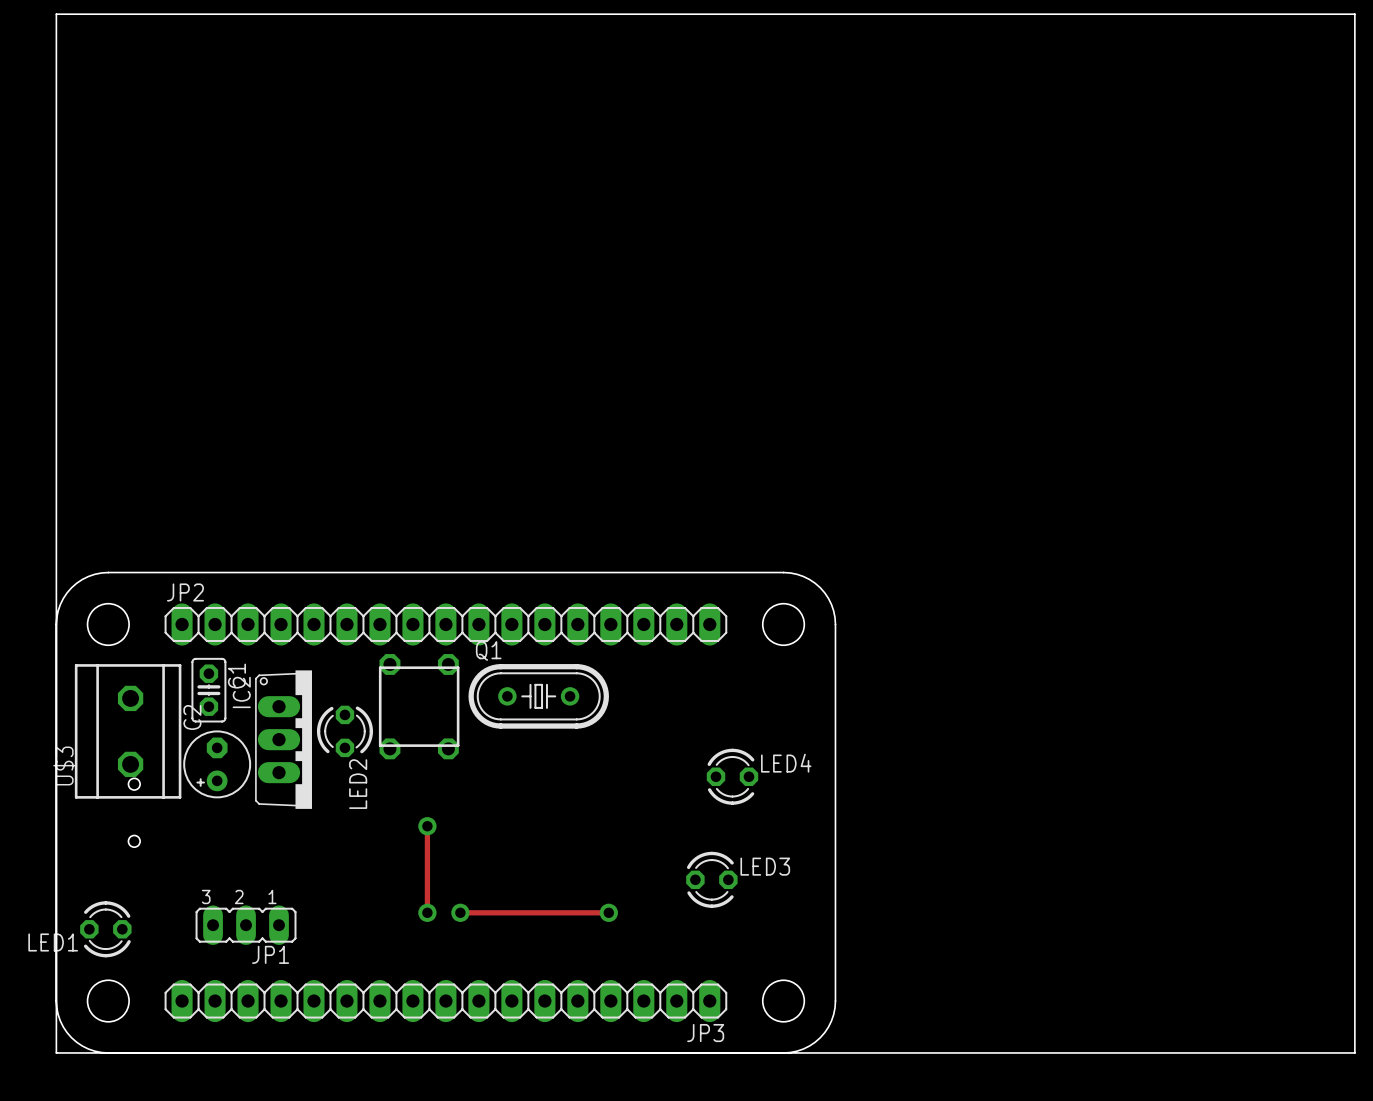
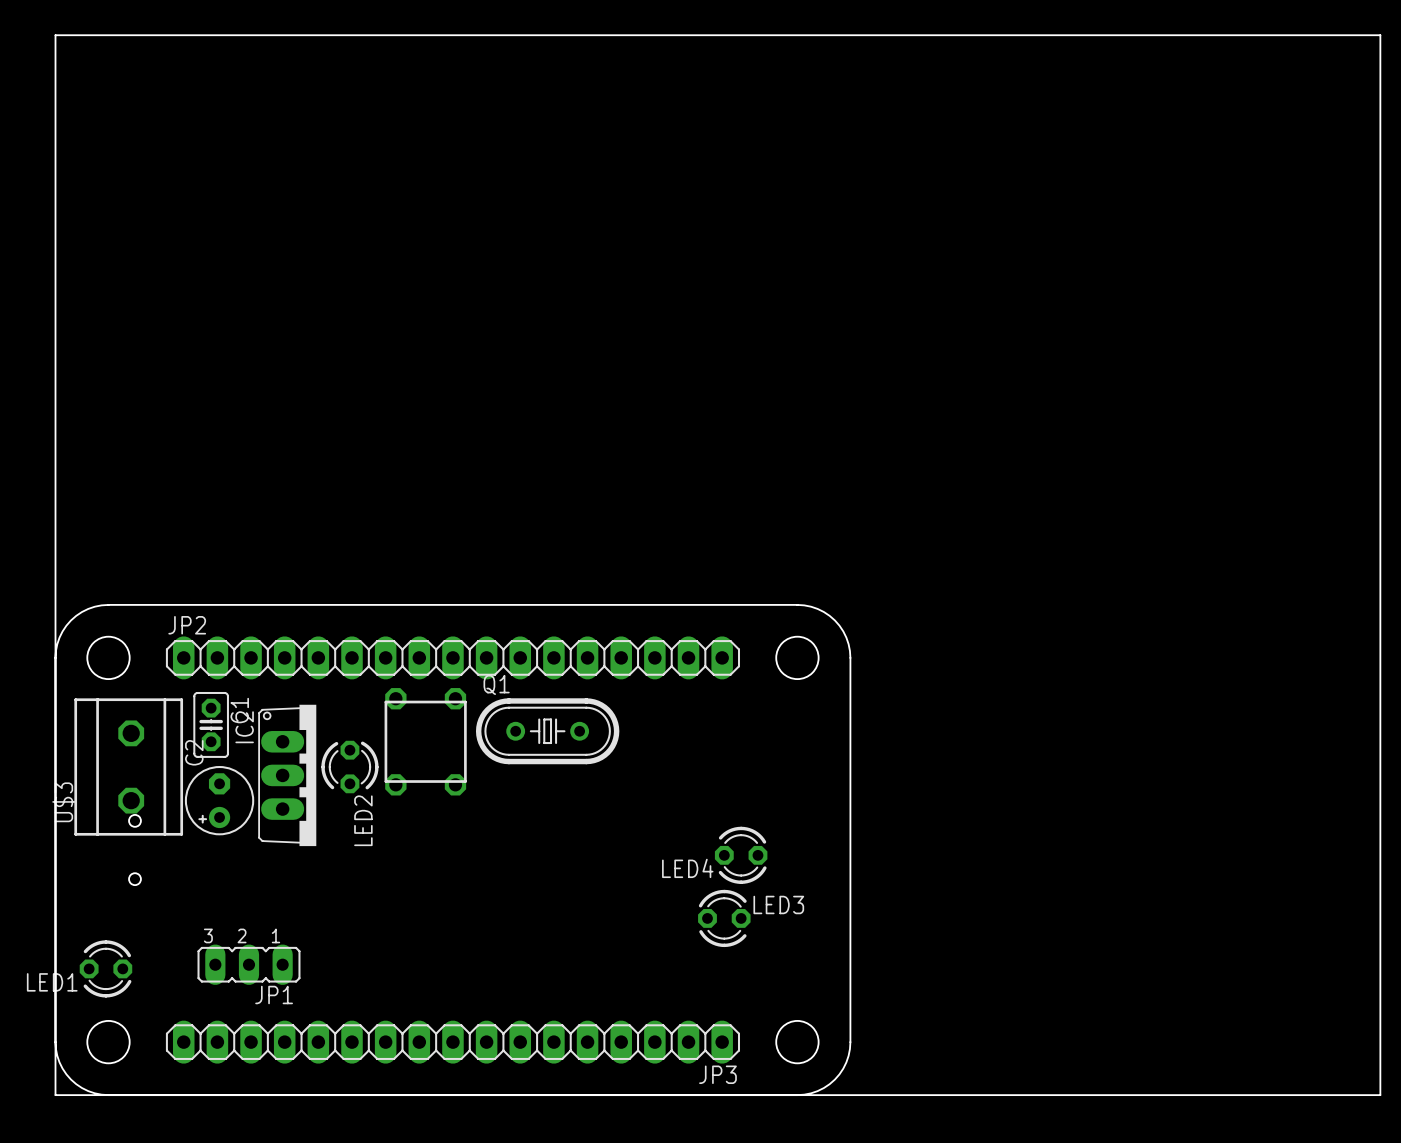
LED4 rotation: 0° (732, 776) -> 180° (741, 855)
LED4 position: (732, 776) -> (741, 855)
track: (427, 826) (427, 912) -> none
via: (427, 826) -> none
via: (427, 912) -> none
track: (460, 912) (608, 912) -> none
via: (460, 912) -> none
via: (608, 912) -> none

